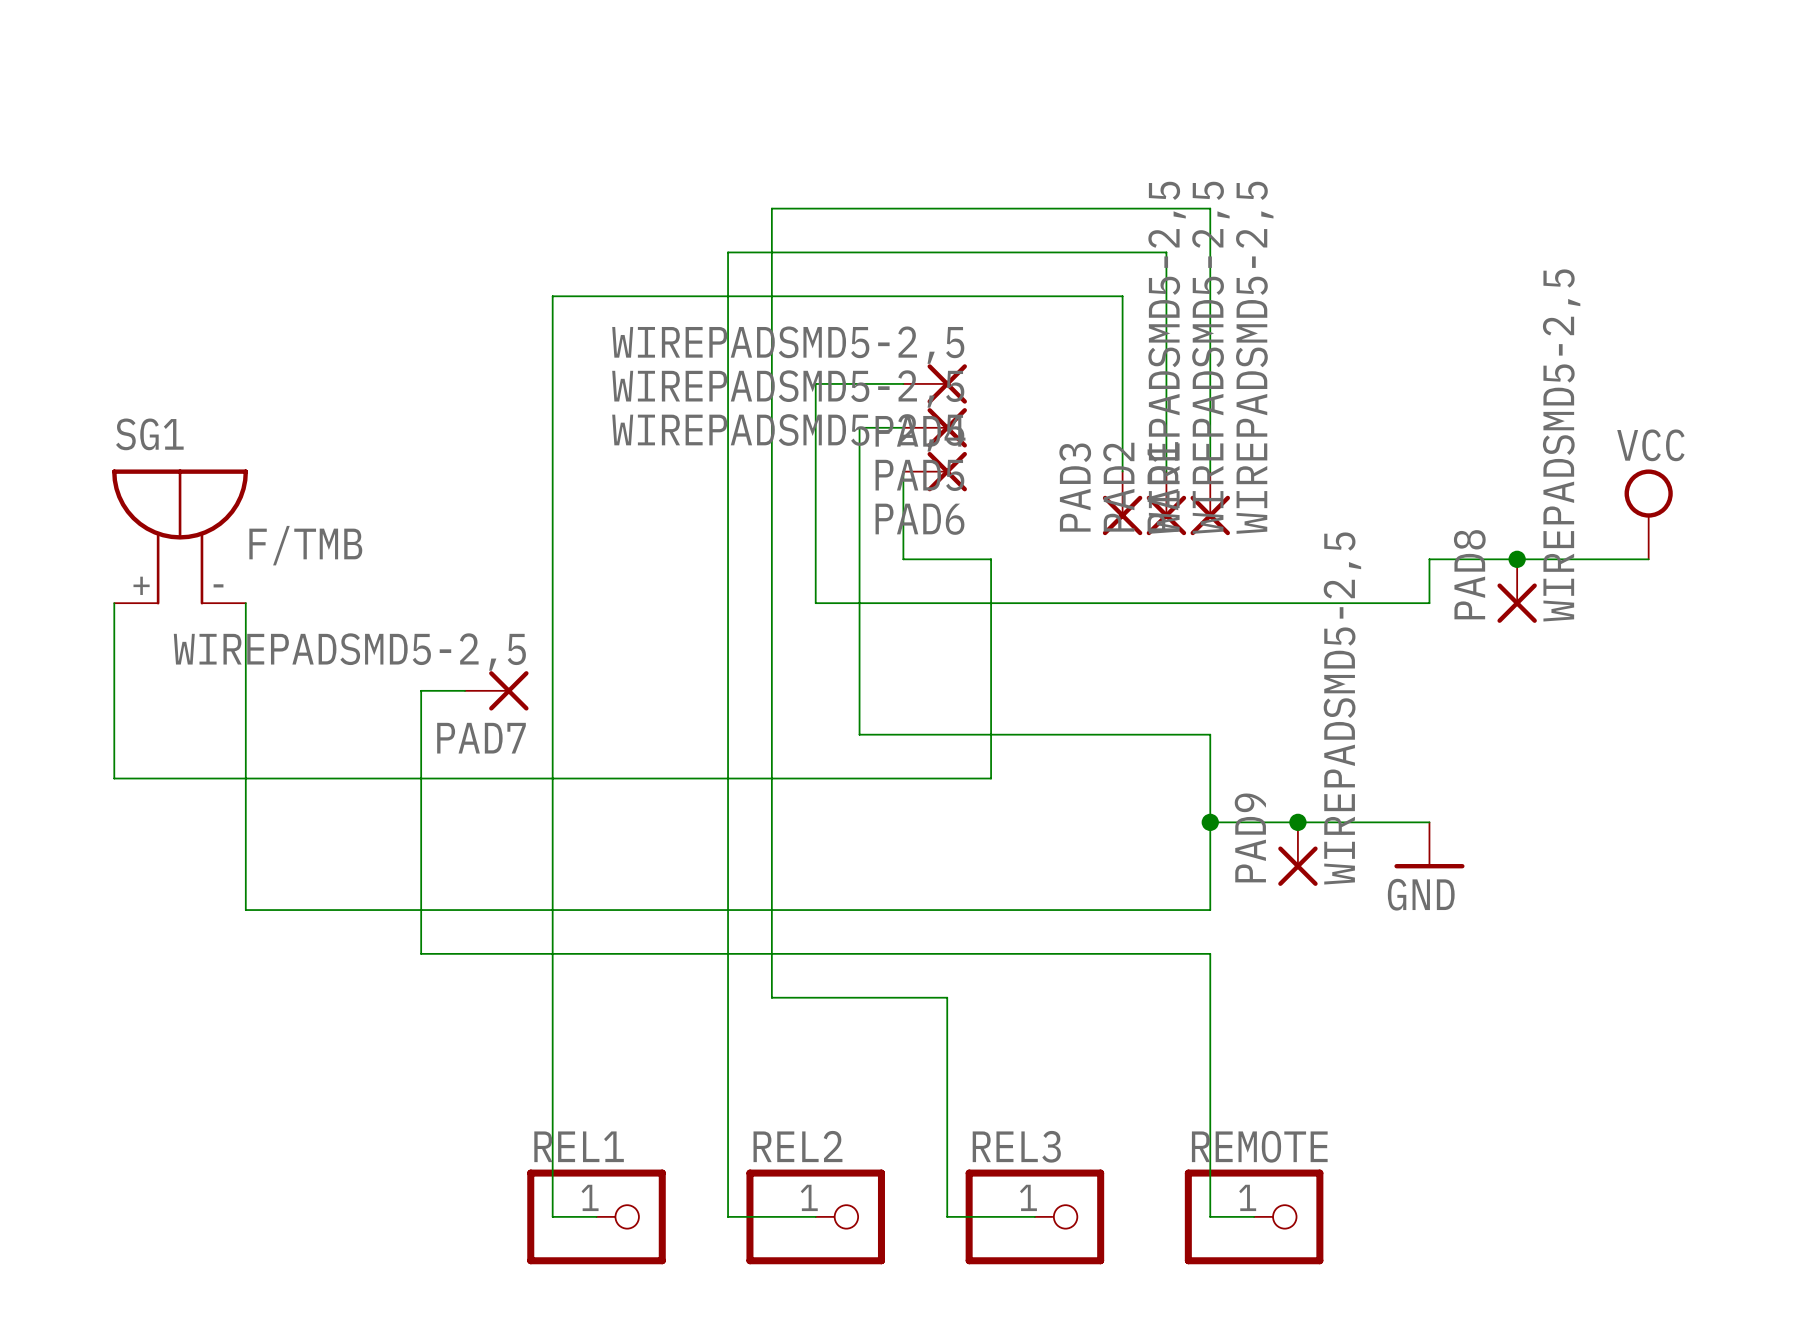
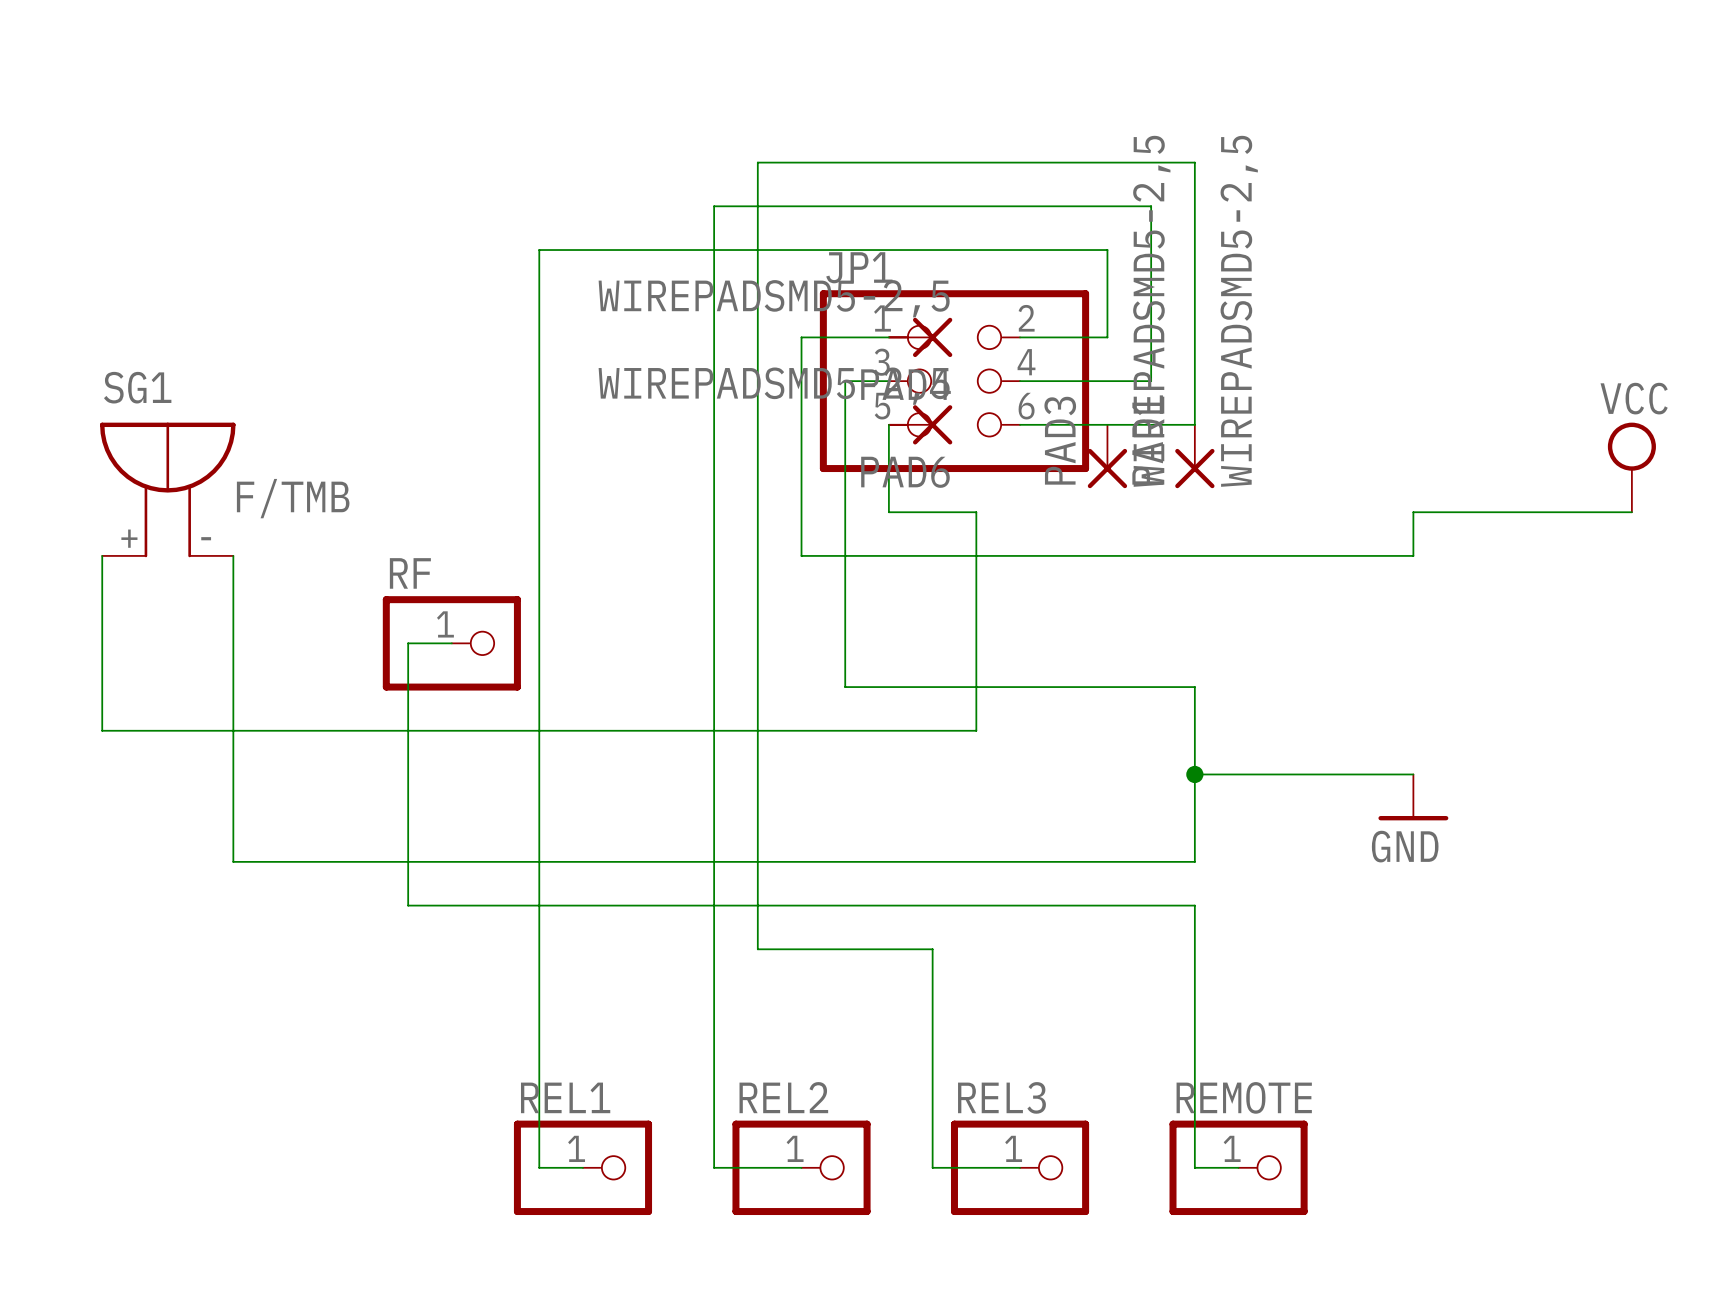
wire: (1122, 383) (1122, 471) -> (1107, 337) (1020, 337)
PAD5: WIREPADSMD5-2,5 (935, 427) -> none
JP1: none -> (954, 381)
wire: (1166, 427) (1166, 471) -> (1151, 381) (1020, 381)
wire: none -> (1020, 424) (1194, 424)
PAD2: WIREPADSMD5-2,5 (1166, 503) -> none
junction: (1517, 559) -> none
PAD8: WIREPADSMD5-2,5 (1517, 591) -> none
RF: none -> (451, 643)
PAD7: WIREPADSMD5-2,5 (496, 690) -> none
junction: (1297, 822) -> none
PAD9: WIREPADSMD5-2,5 (1297, 854) -> none

